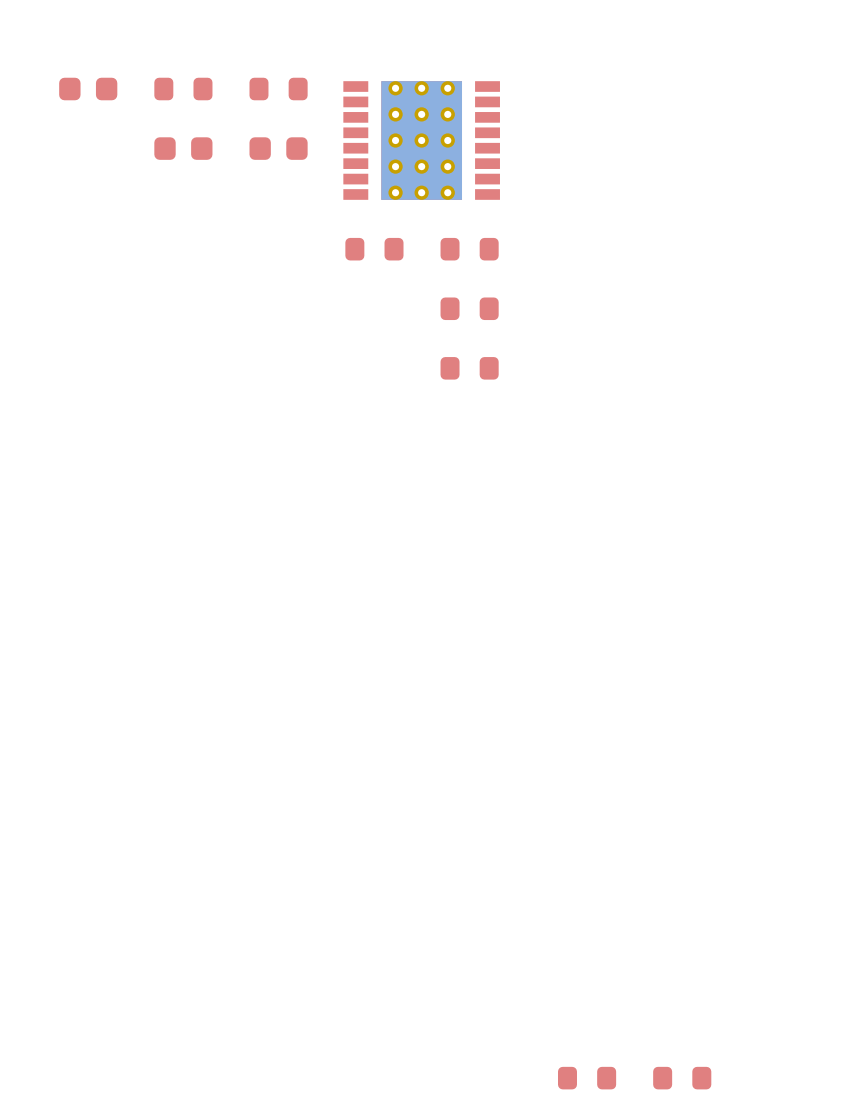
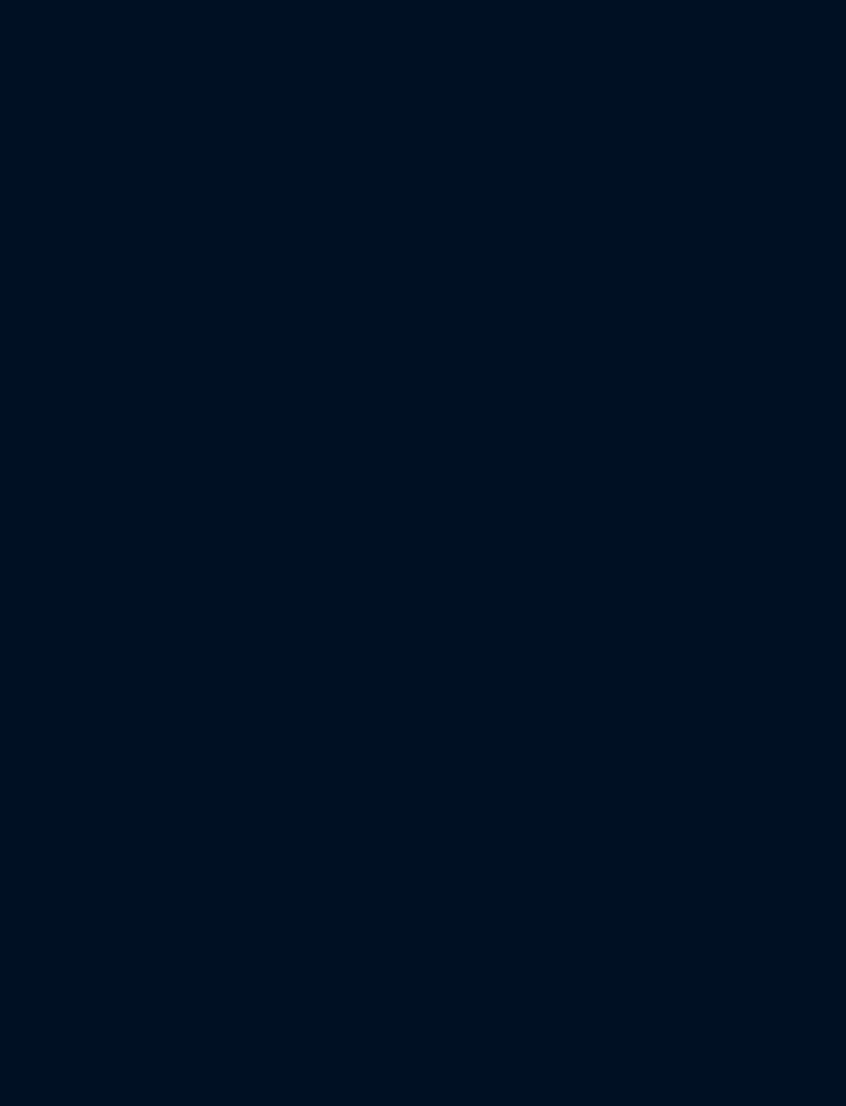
part: (88, 89) -> none
part: (183, 89) -> none
part: (278, 89) -> none
part: (421, 140) -> none
part: (183, 148) -> none
part: (278, 148) -> none
part: (374, 249) -> none
part: (469, 249) -> none
part: (469, 308) -> none
part: (469, 368) -> none
part: (587, 1078) -> none
part: (682, 1078) -> none

